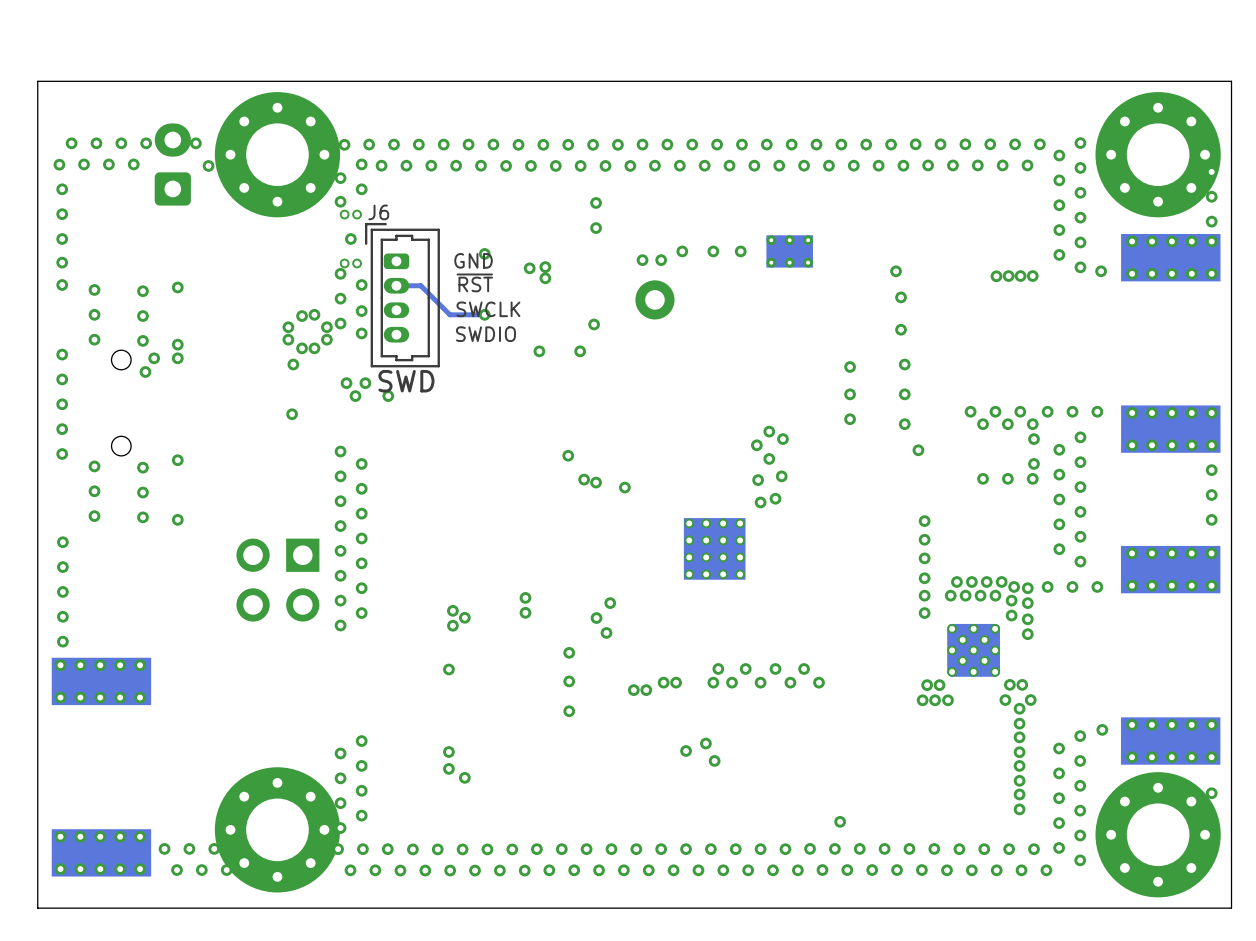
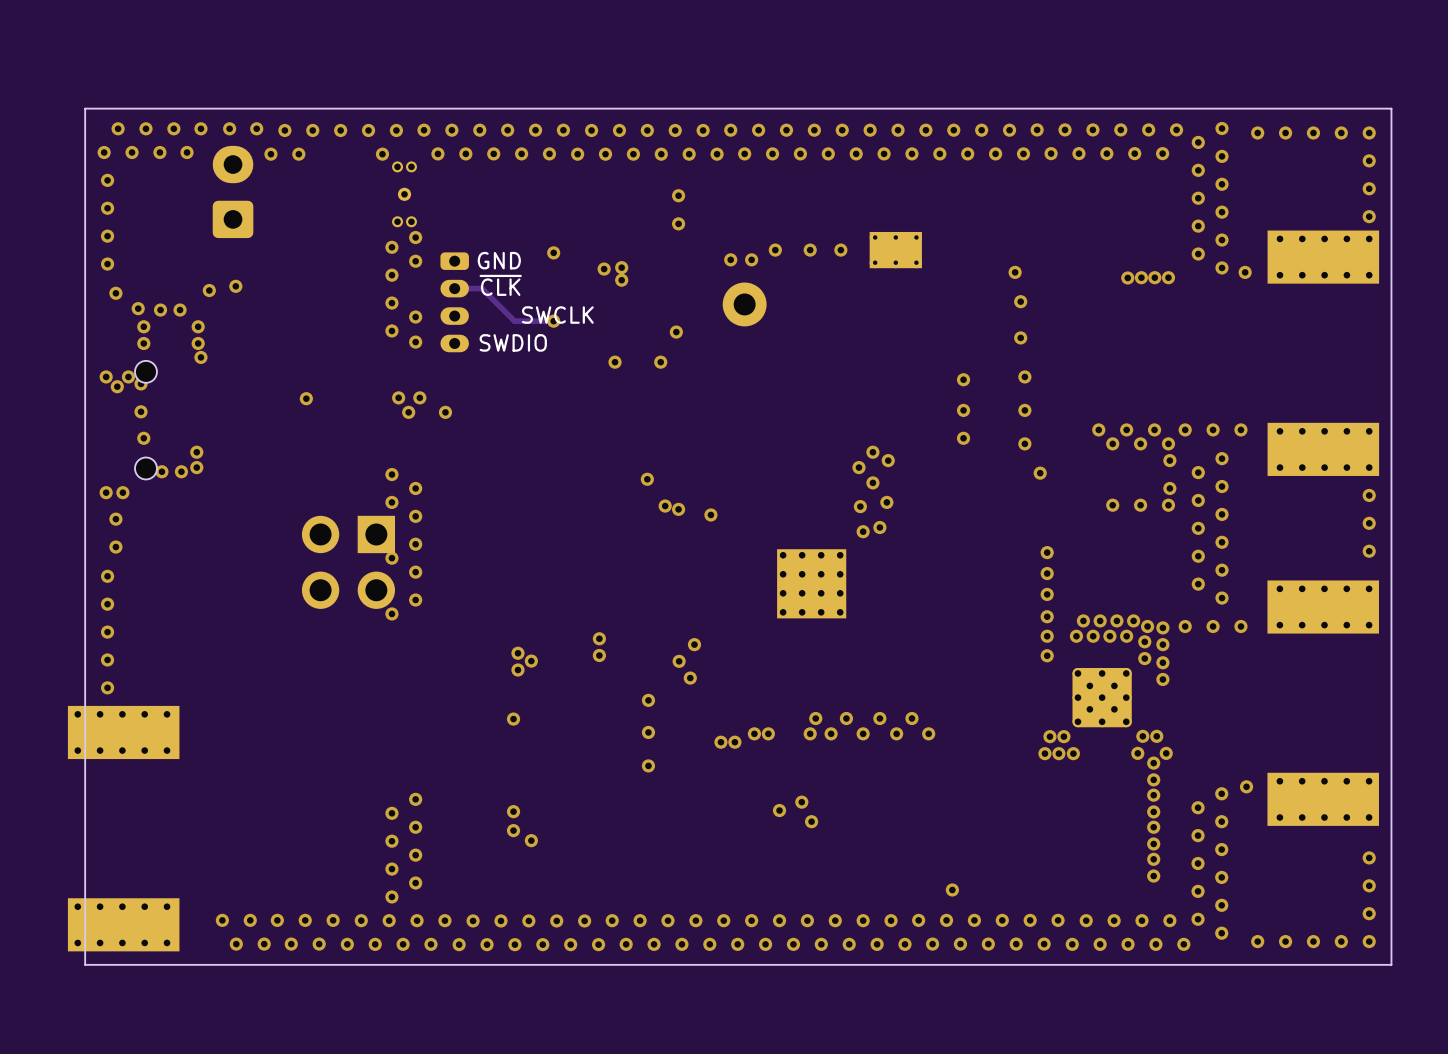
board edge: (1231, 125) (1231, 81) (37, 81) (37, 908) (1231, 908) (1231, 888) -> (1391, 108) (85, 108) (85, 964) (1391, 964)
via: (71, 143) -> none
via: none -> (200, 128)
via: none -> (256, 128)
via: none -> (284, 130)
via: none -> (312, 130)
via: none -> (340, 130)
via: none -> (368, 130)
via: none -> (1257, 132)
via: none -> (1285, 132)
via: none -> (1313, 132)
via: none -> (1341, 132)
via: none -> (1369, 132)
part: (277, 154) -> none
part: (1158, 154) -> none
via: (59, 164) -> none
via: none -> (187, 152)
part position: (172, 164) -> (233, 191)
via: (361, 164) -> none
via: (208, 165) -> none
via: none -> (270, 154)
via: none -> (298, 154)
via: none -> (382, 154)
via: (340, 178) -> none
via: (62, 189) -> none
via: none -> (107, 180)
via: (361, 189) -> none
via: (340, 201) -> none
via: (62, 214) -> none
via: none -> (107, 208)
via: (62, 239) -> none
via: none -> (107, 236)
part position: (350, 239) -> (404, 194)
via: none -> (415, 237)
via: none -> (391, 247)
text position: GND (473, 260) -> GND (499, 260)
via: none -> (415, 261)
via: (62, 262) -> none
via: none -> (107, 264)
text: none -> ~{CLK} (500, 285)
text: ~{RST} (474, 282) -> none
via: none -> (235, 286)
via: (62, 284) -> none
via: (361, 284) -> none
via: (142, 291) -> none
J6 side: bottom (402, 295) -> top (454, 302)
via: none -> (138, 308)
via: none -> (160, 310)
via: none -> (180, 310)
via: (94, 314) -> none
via: (314, 314) -> none
via: (142, 316) -> none
via: (302, 316) -> none
via: none -> (143, 326)
via: none -> (198, 326)
via: (288, 327) -> none
via: (326, 327) -> none
via: none -> (143, 343)
via: none -> (198, 343)
text position: SWDIO (485, 334) -> SWDIO (513, 342)
via: (94, 339) -> none
via: (288, 339) -> none
via: (326, 339) -> none
via: (142, 340) -> none
via: (177, 344) -> none
via: none -> (200, 357)
via: (302, 348) -> none
via: (314, 348) -> none
via: (62, 354) -> none
via: (154, 358) -> none
via: (177, 358) -> none
via: none -> (106, 376)
via: none -> (128, 376)
via: (293, 364) -> none
via: none -> (141, 383)
via: (145, 371) -> none
via: none -> (117, 386)
via: (62, 379) -> none
text: SWD (406, 381) -> none
via: none -> (306, 398)
via: none -> (141, 411)
via: (62, 404) -> none
via: (292, 414) -> none
via: none -> (143, 438)
via: (62, 429) -> none
via: none -> (196, 452)
via: none -> (196, 467)
via: none -> (161, 471)
via: none -> (181, 471)
via: (62, 454) -> none
via: (177, 460) -> none
via: (94, 466) -> none
via: none -> (106, 492)
via: none -> (122, 492)
via: (142, 467) -> none
via: (142, 492) -> none
via: (340, 501) -> none
via: (142, 517) -> none
via: (177, 519) -> none
via: (62, 542) -> none
via: none -> (107, 576)
via: (340, 550) -> none
via: (62, 567) -> none
via: none -> (107, 604)
part position: (277, 580) -> (348, 562)
via: (361, 588) -> none
via: (62, 591) -> none
via: none -> (107, 632)
via: (340, 600) -> none
via: (361, 613) -> none
via: (62, 616) -> none
via: none -> (107, 659)
via: (340, 625) -> none
via: (62, 641) -> none
via: none -> (107, 687)
via: none -> (1369, 885)
part: (277, 829) -> none
part: (1158, 834) -> none
via: none -> (1369, 913)
via: (164, 848) -> none
via: none -> (277, 920)
via: none -> (305, 920)
via: none -> (333, 920)
via: none -> (361, 920)
via: none -> (1257, 941)
via: none -> (1285, 941)
via: none -> (1313, 941)
via: none -> (1341, 941)
via: none -> (1369, 941)
via: (176, 870) -> none
via: none -> (291, 944)
via: none -> (319, 944)
via: none -> (347, 944)
via: none -> (375, 944)

